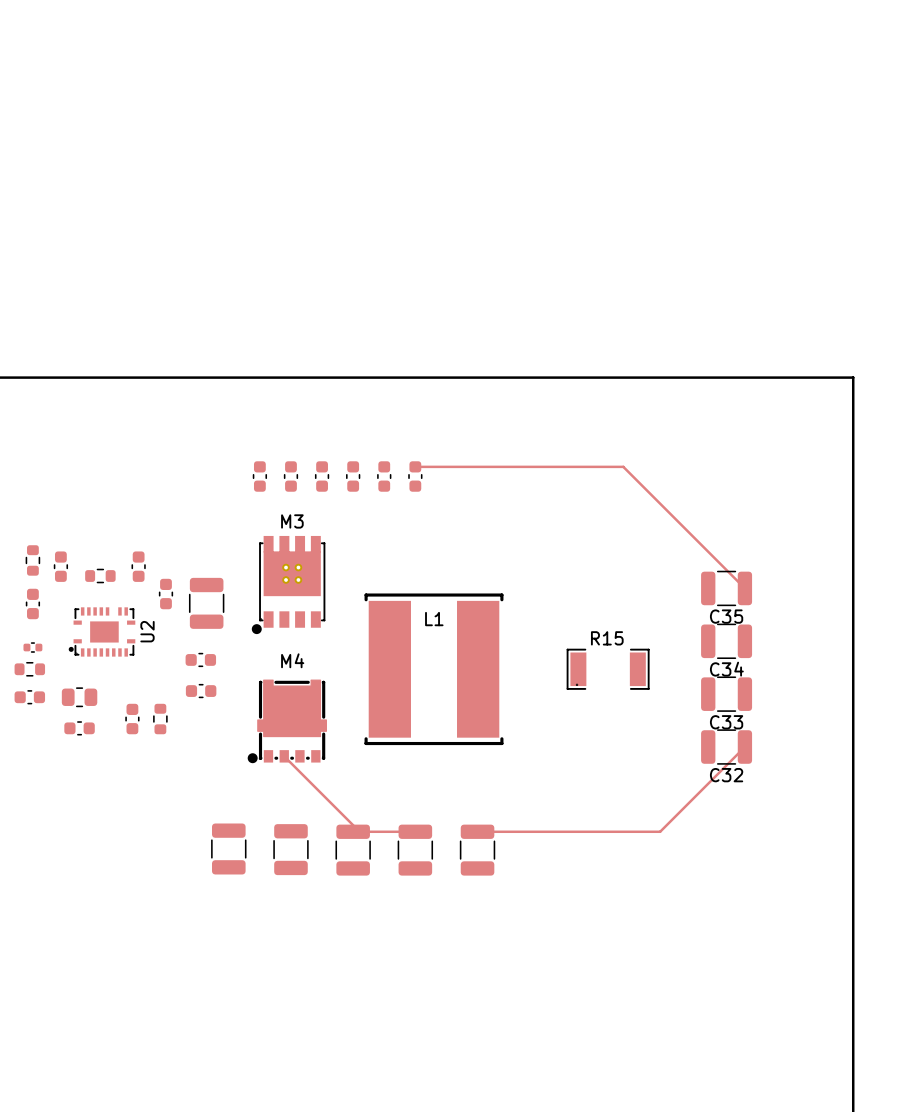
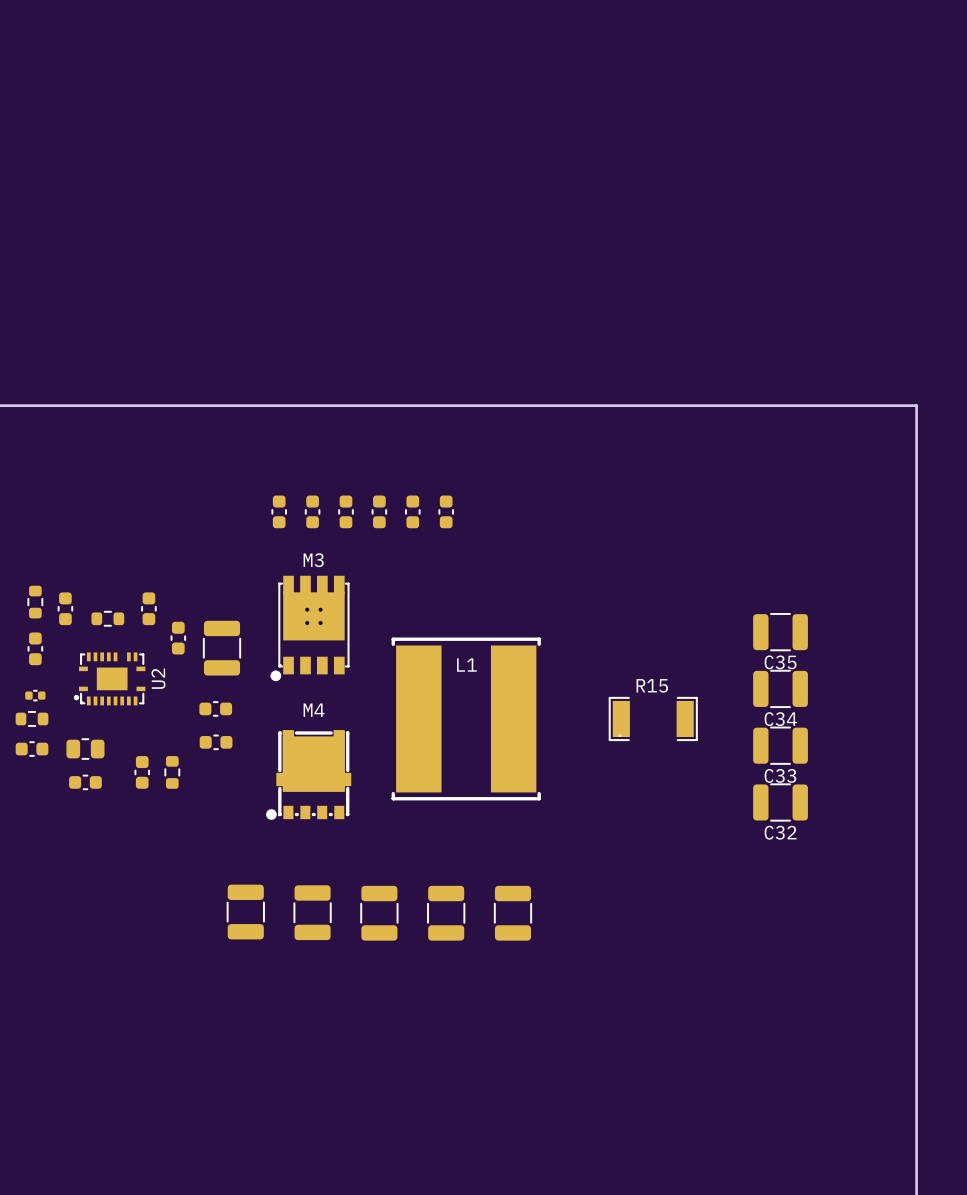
track: (415, 466) (623, 466) (744, 588) -> none
track: (744, 747) (660, 831) (477, 831) -> none
track: (284, 756) (359, 831) (415, 831) -> none

